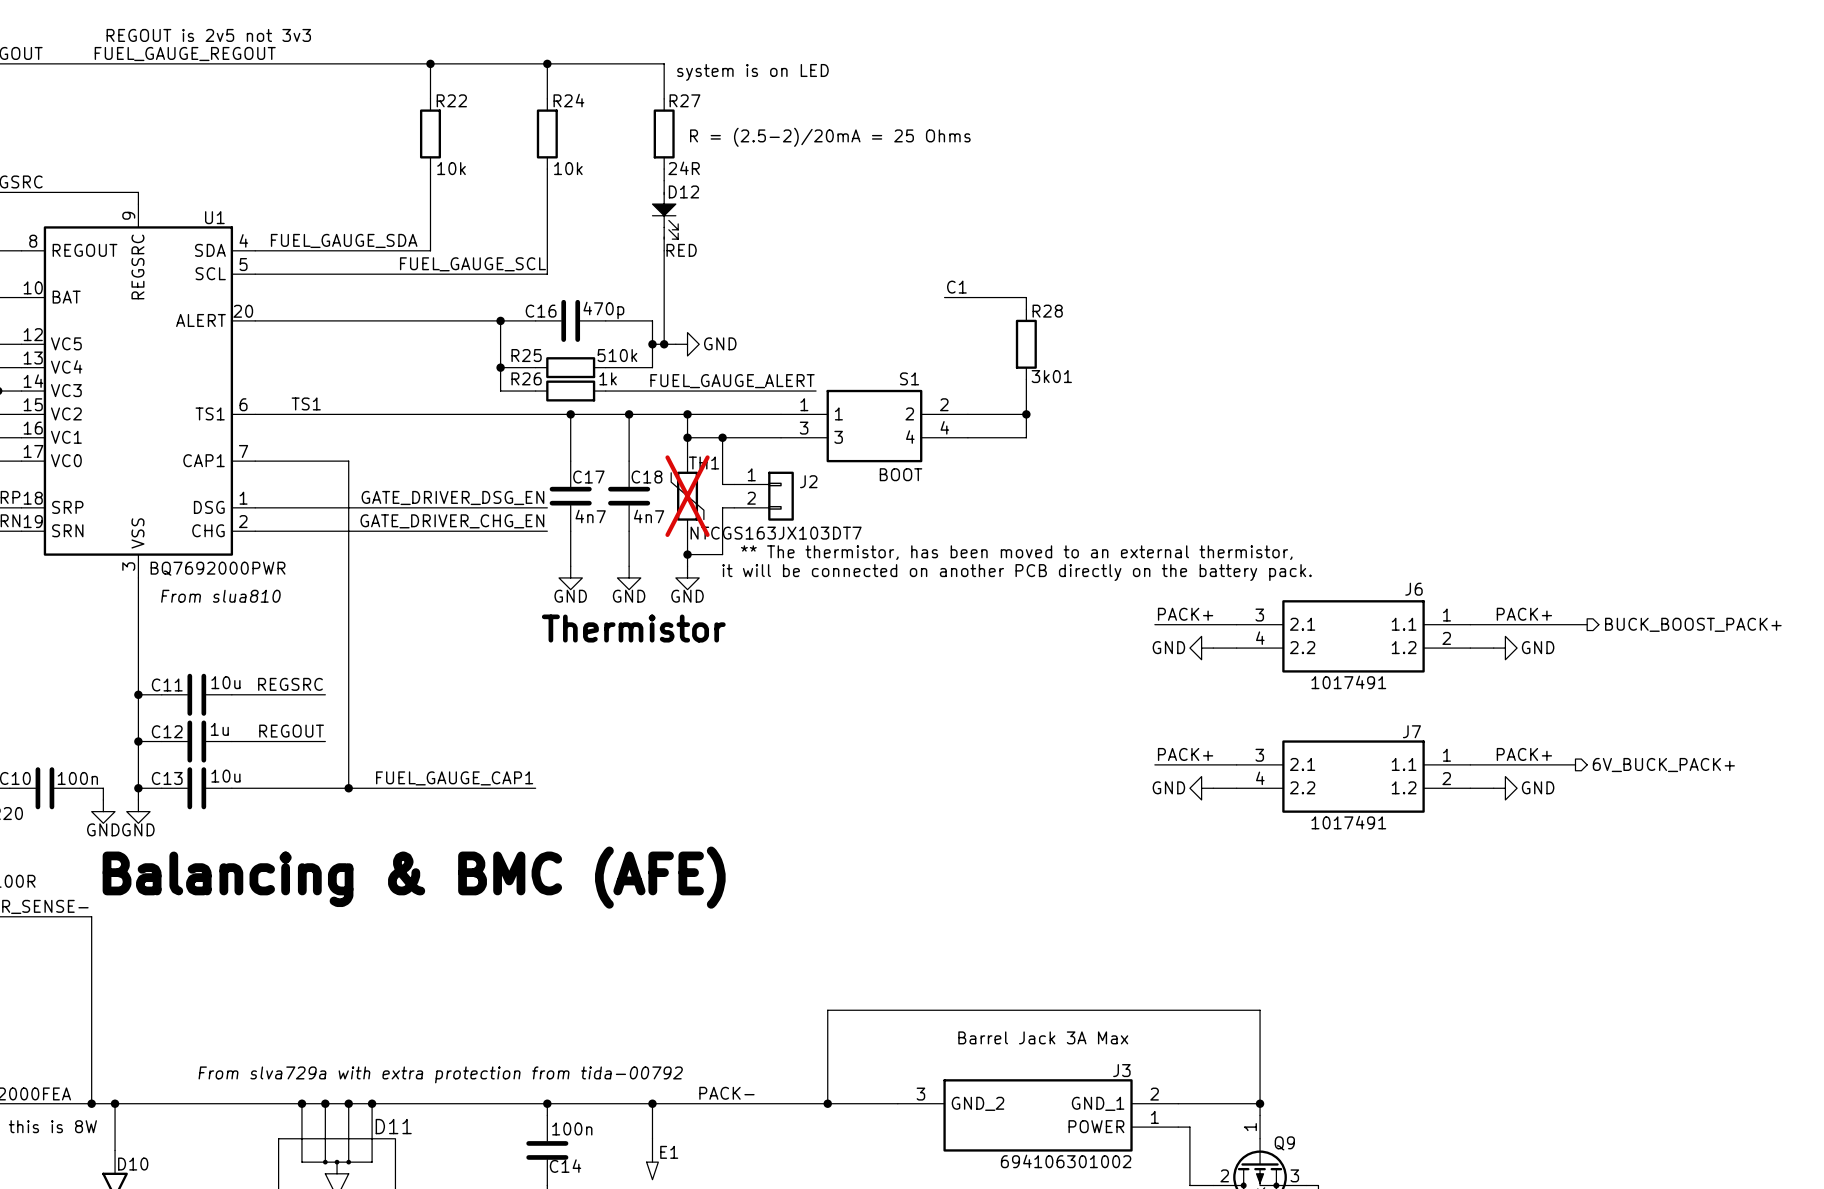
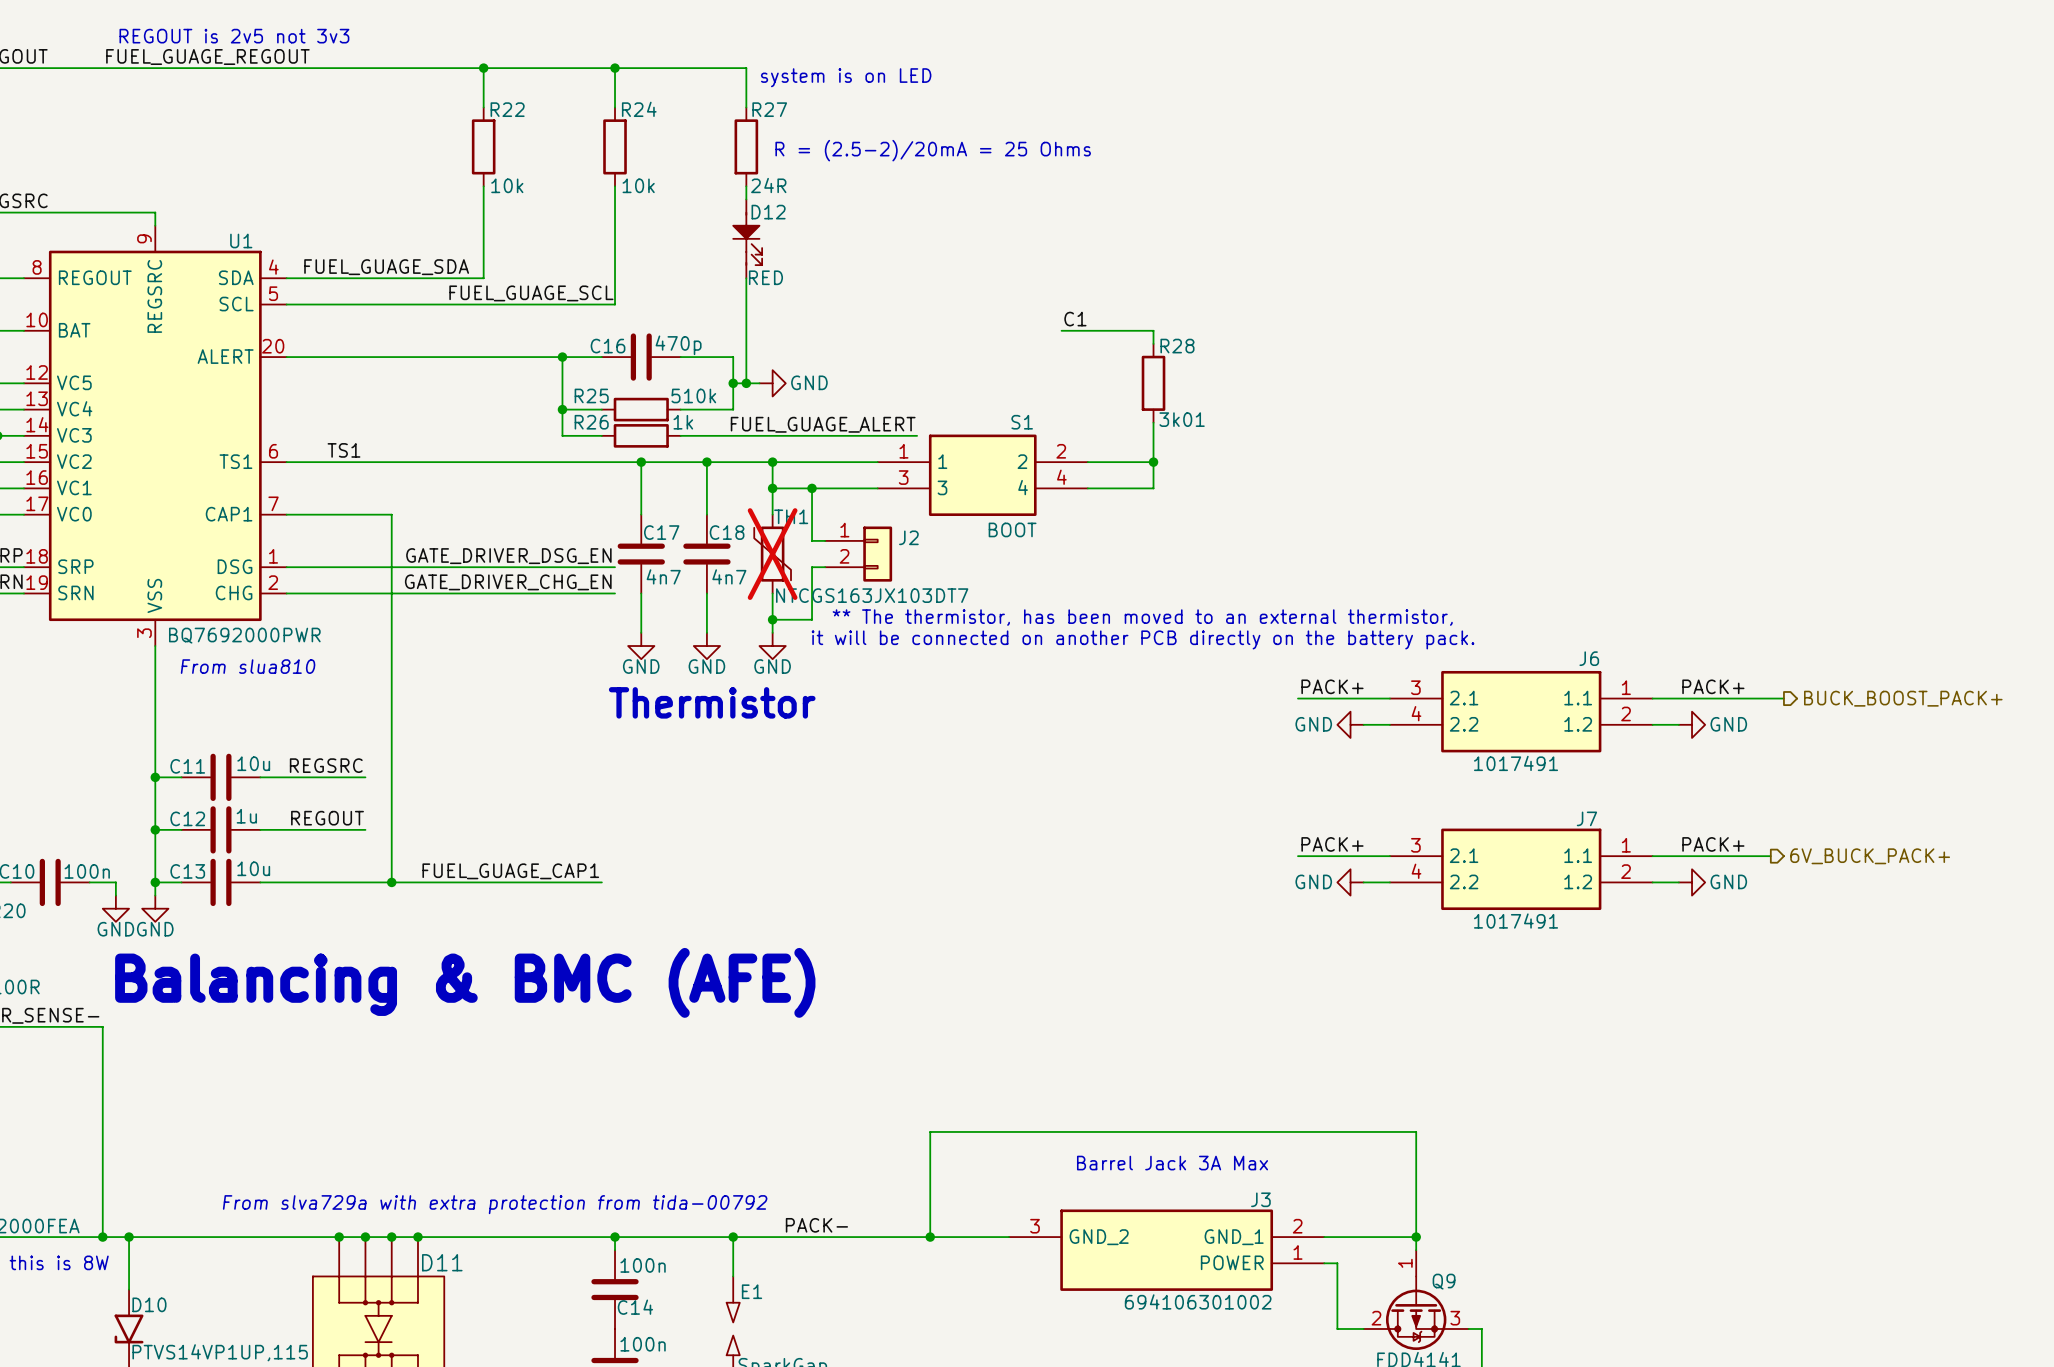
label: FUEL_GAUGE_REGOUT (185, 54) -> FUEL_GUAGE_REGOUT (207, 57)
label: FUEL_GAUGE_SDA (344, 240) -> FUEL_GUAGE_SDA (386, 267)
label: FUEL_GAUGE_SCL (472, 264) -> FUEL_GUAGE_SCL (531, 293)
label: FUEL_GAUGE_ALERT (732, 381) -> FUEL_GUAGE_ALERT (823, 424)
label: FUEL_GAUGE_CAP1 (454, 778) -> FUEL_GUAGE_CAP1 (510, 871)

